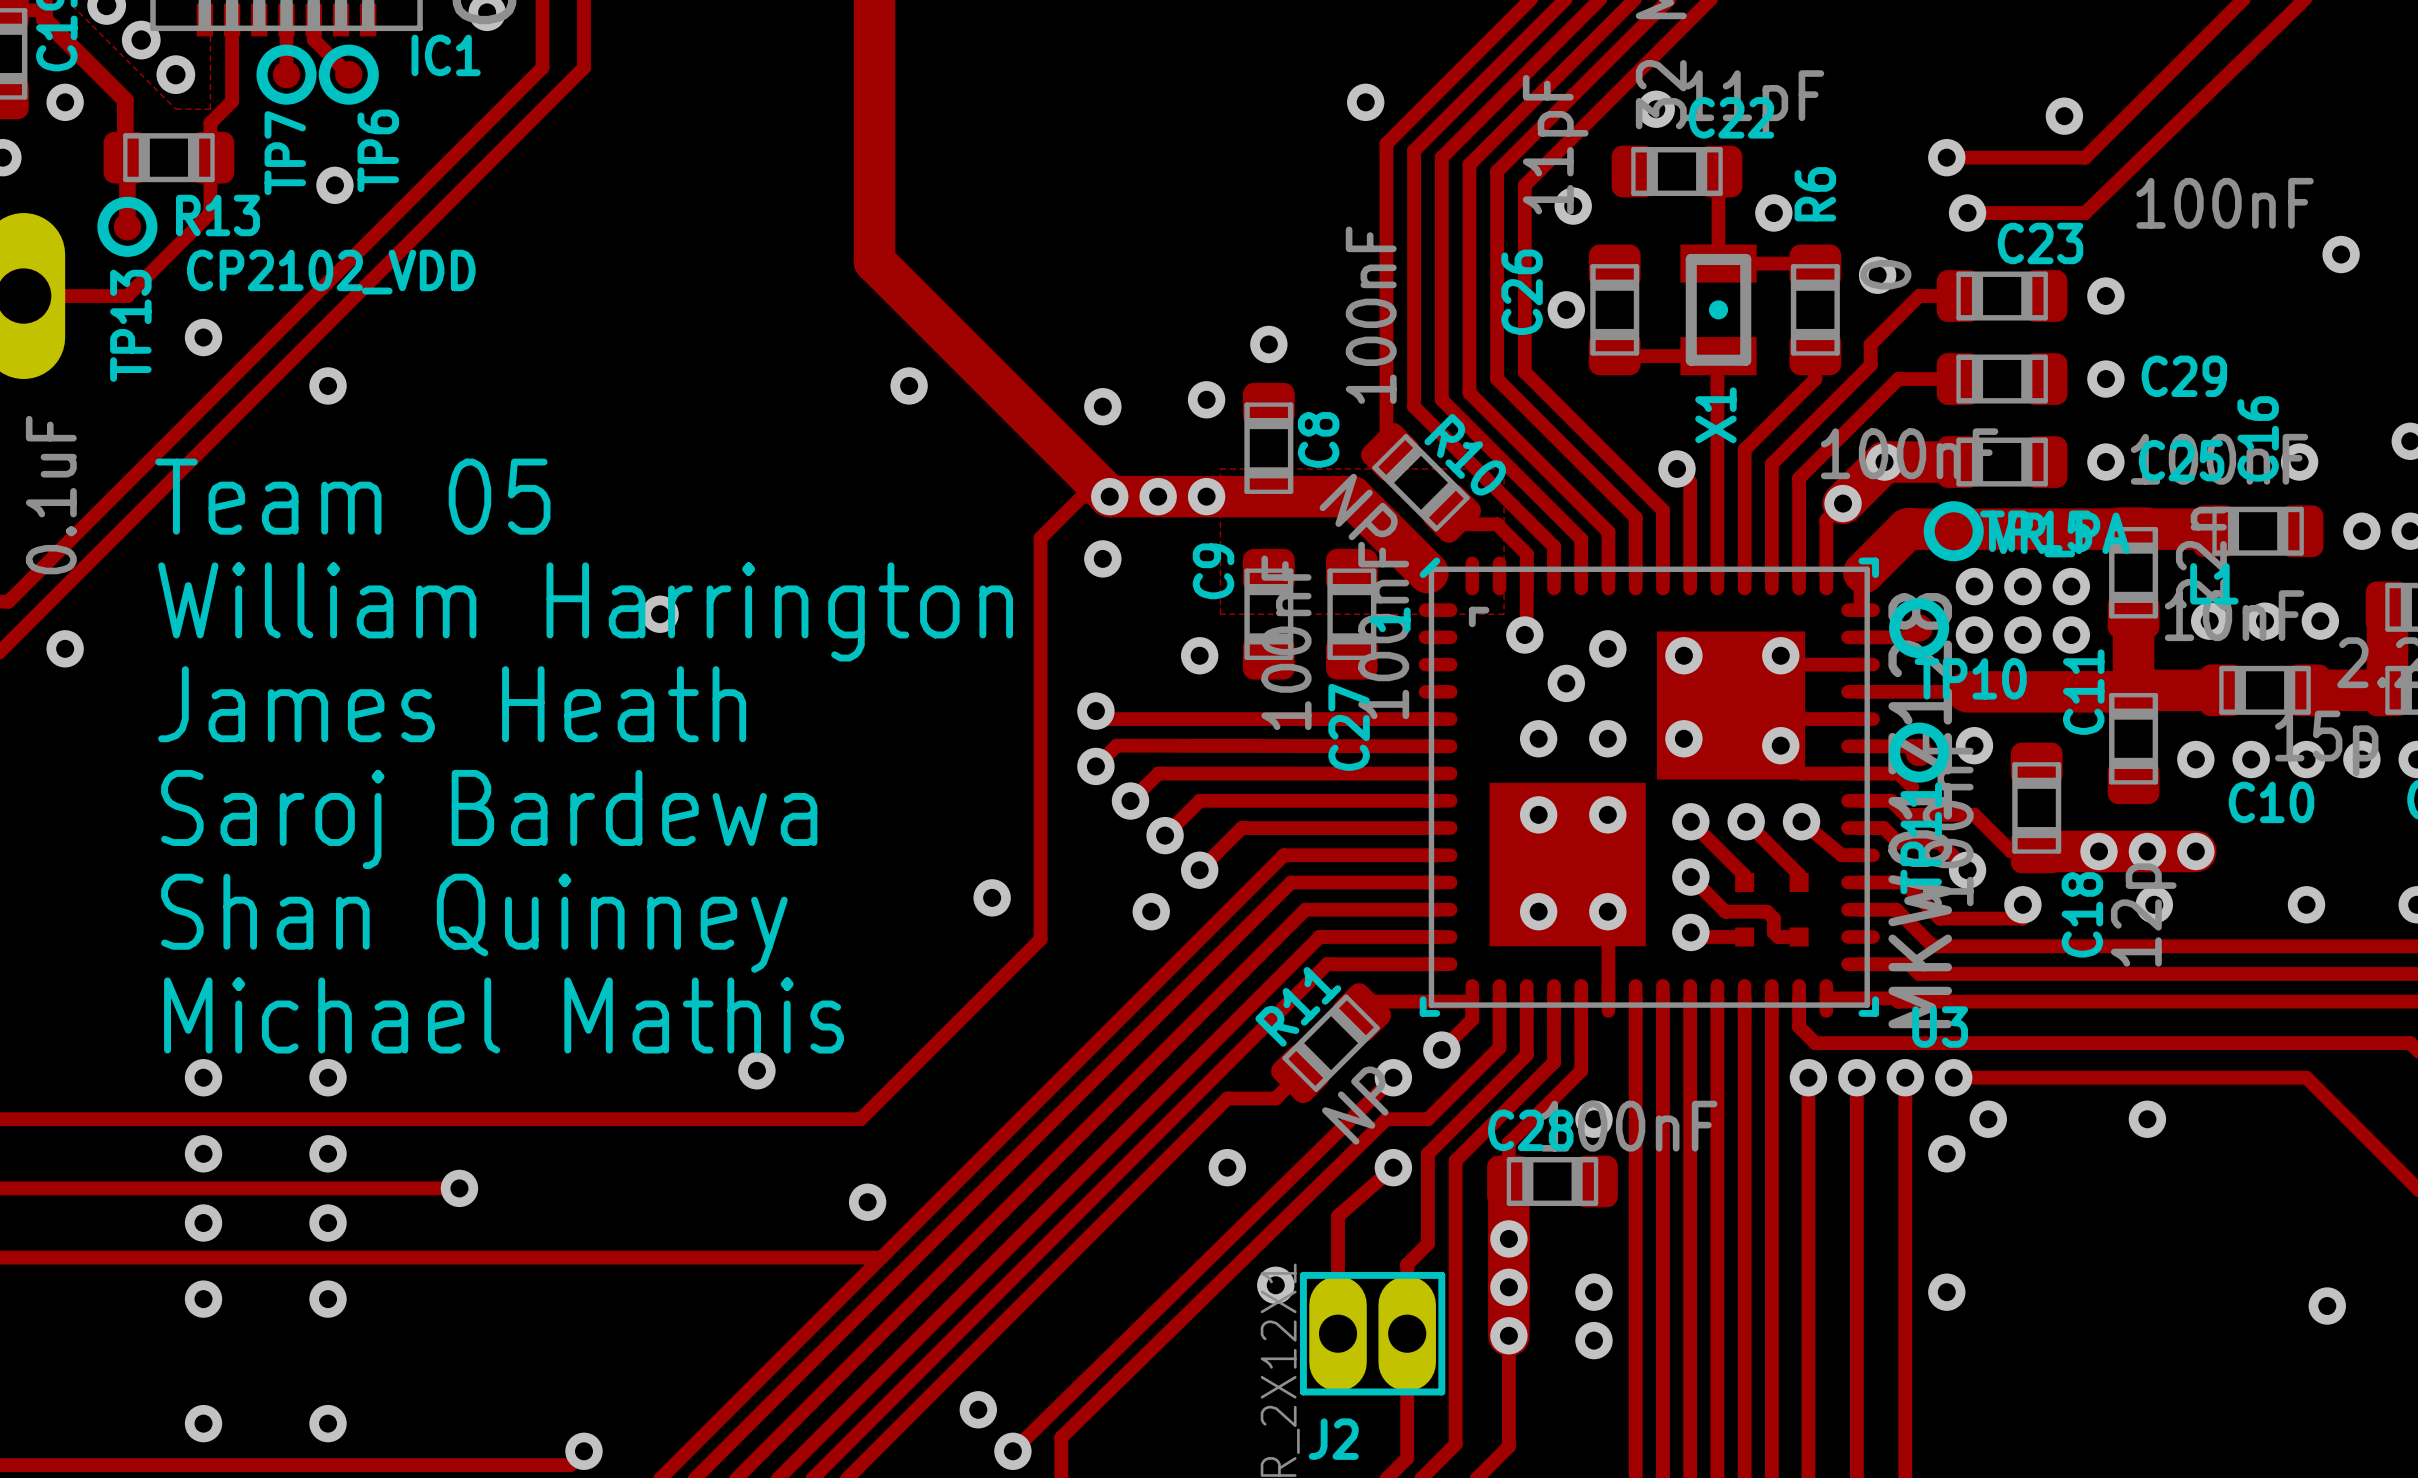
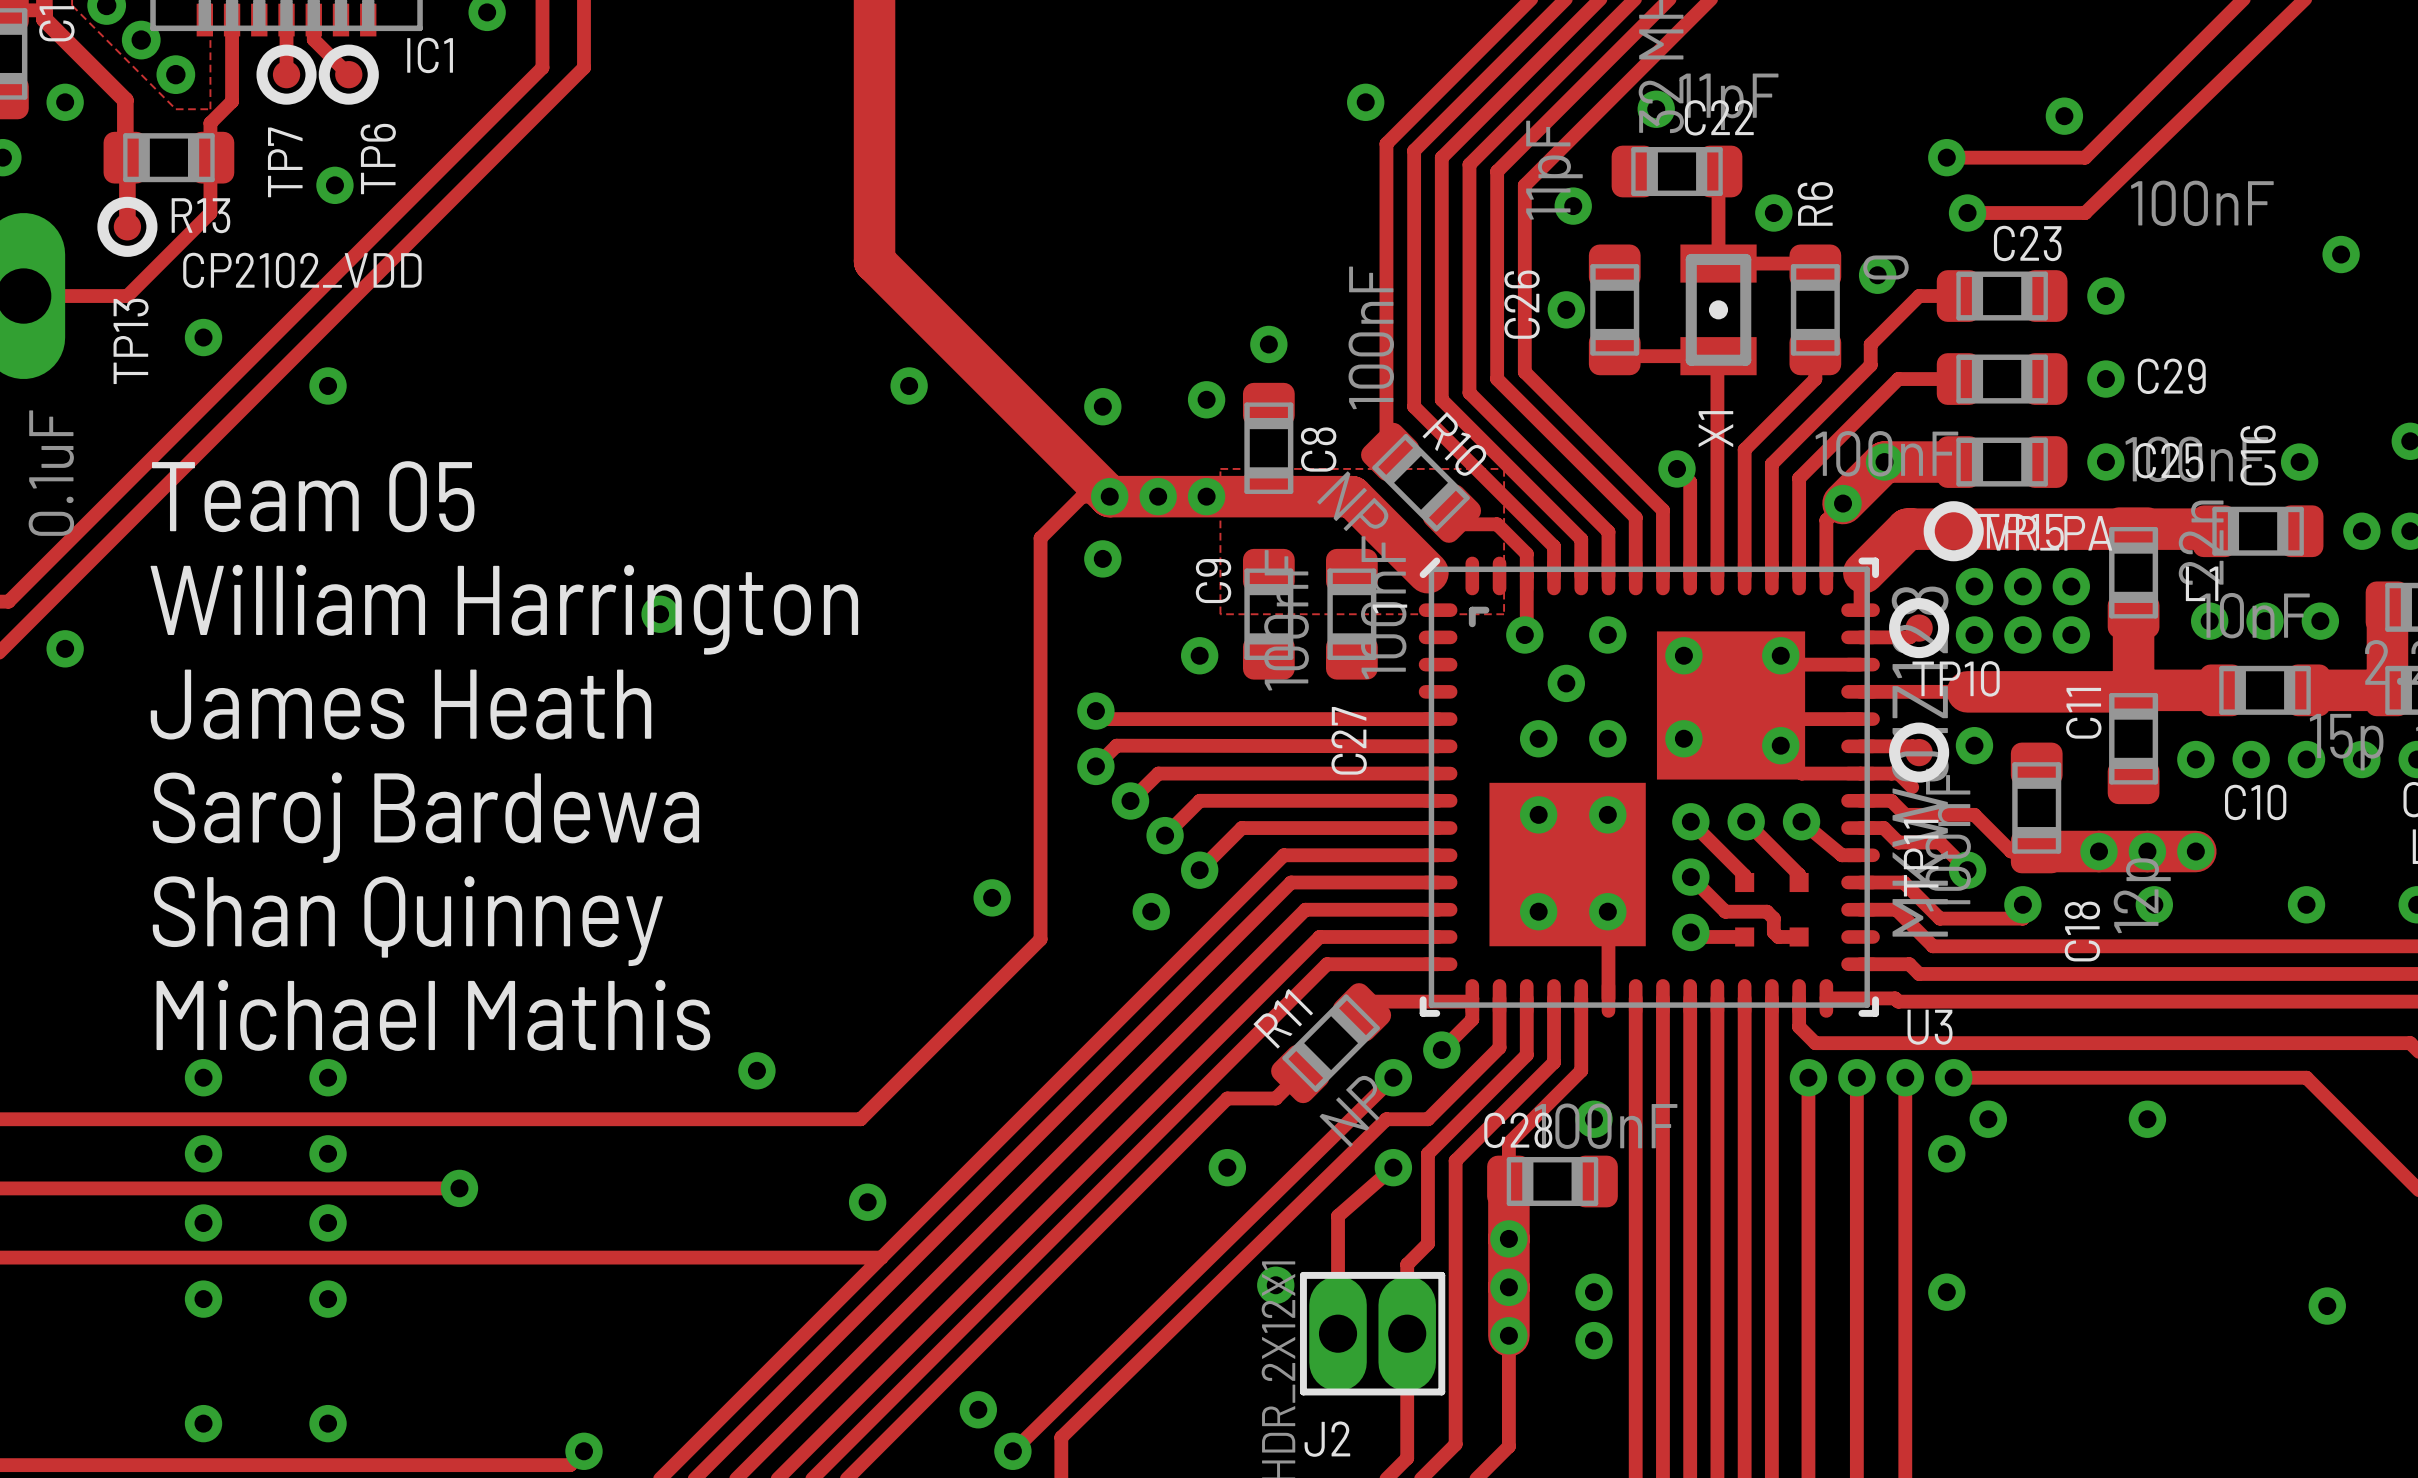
via position: (1607, 648) -> (1607, 634)

